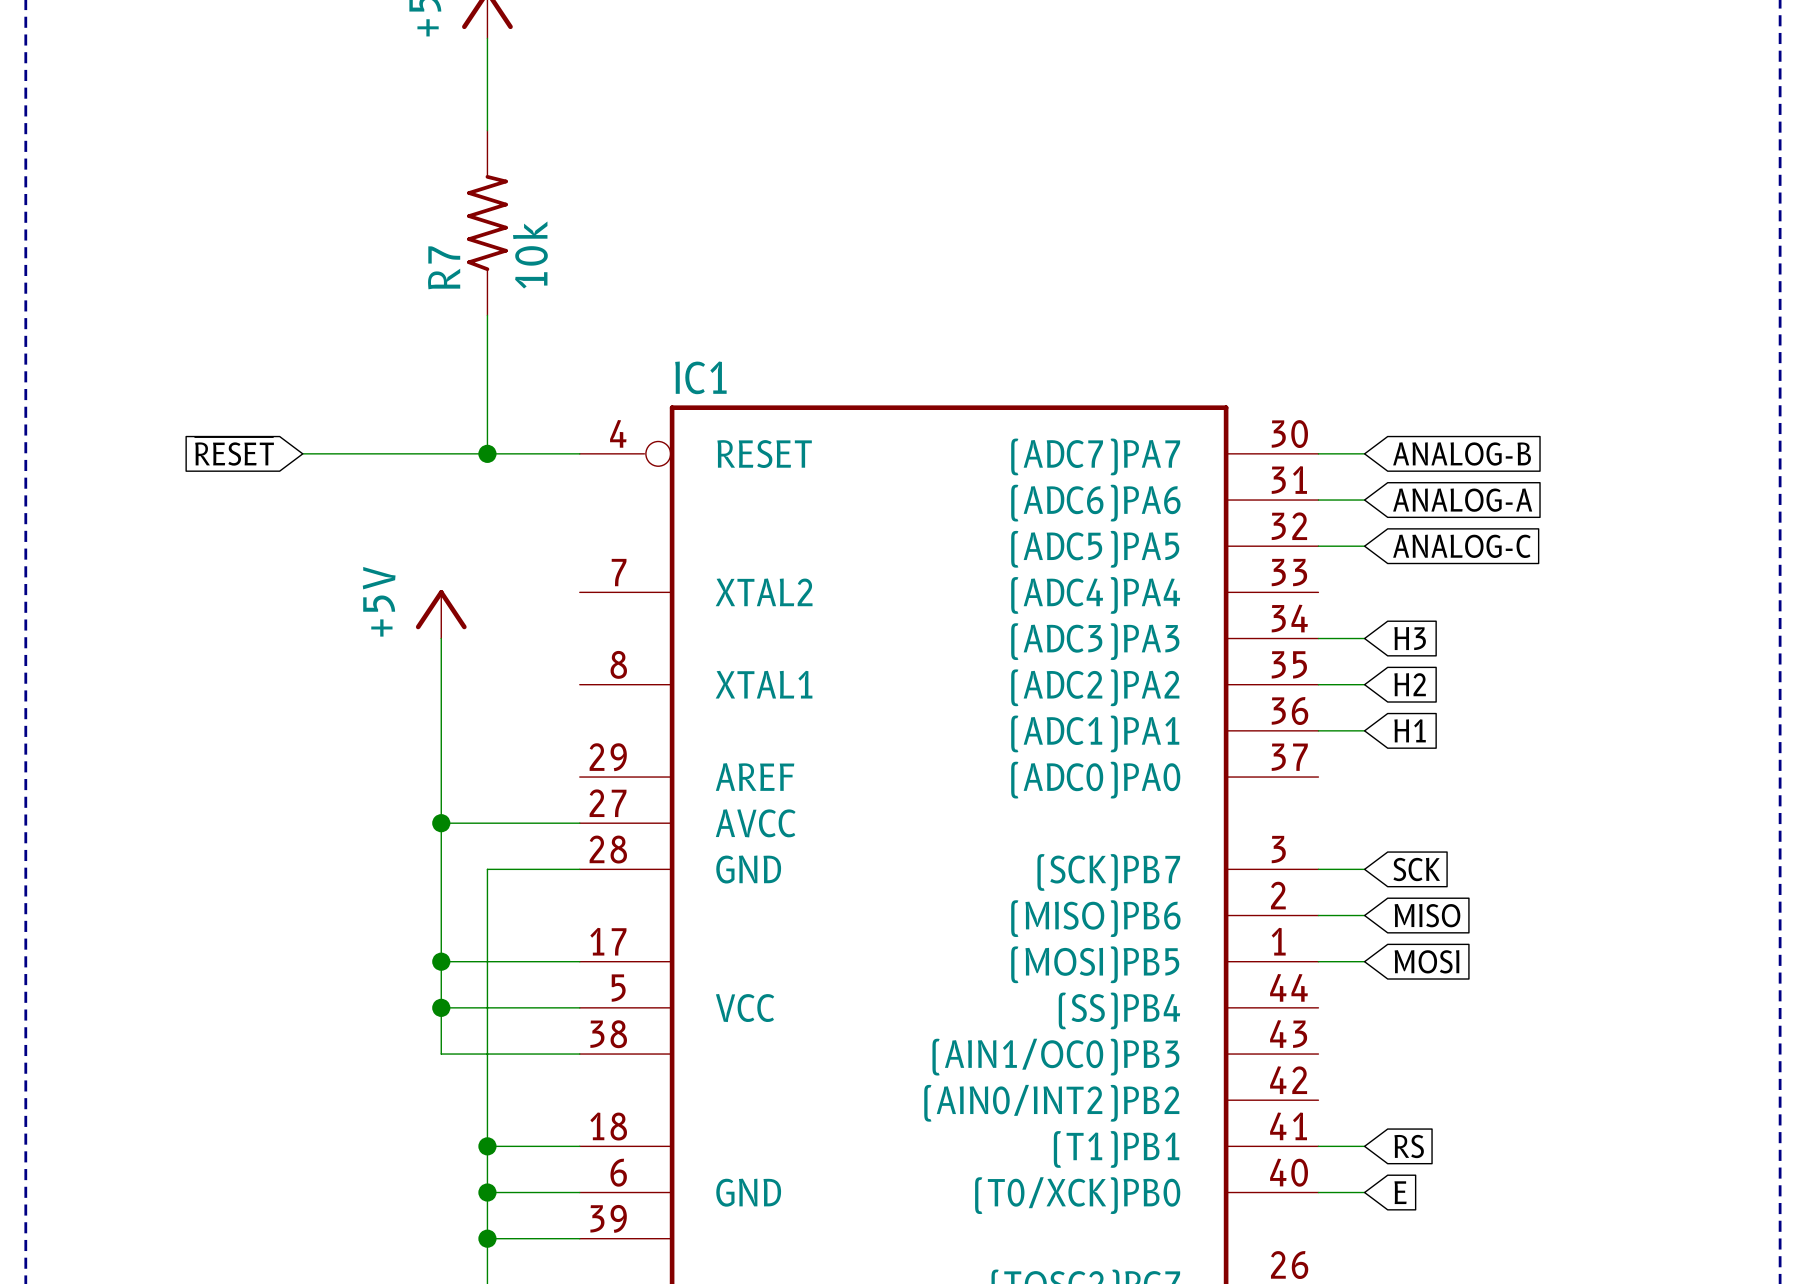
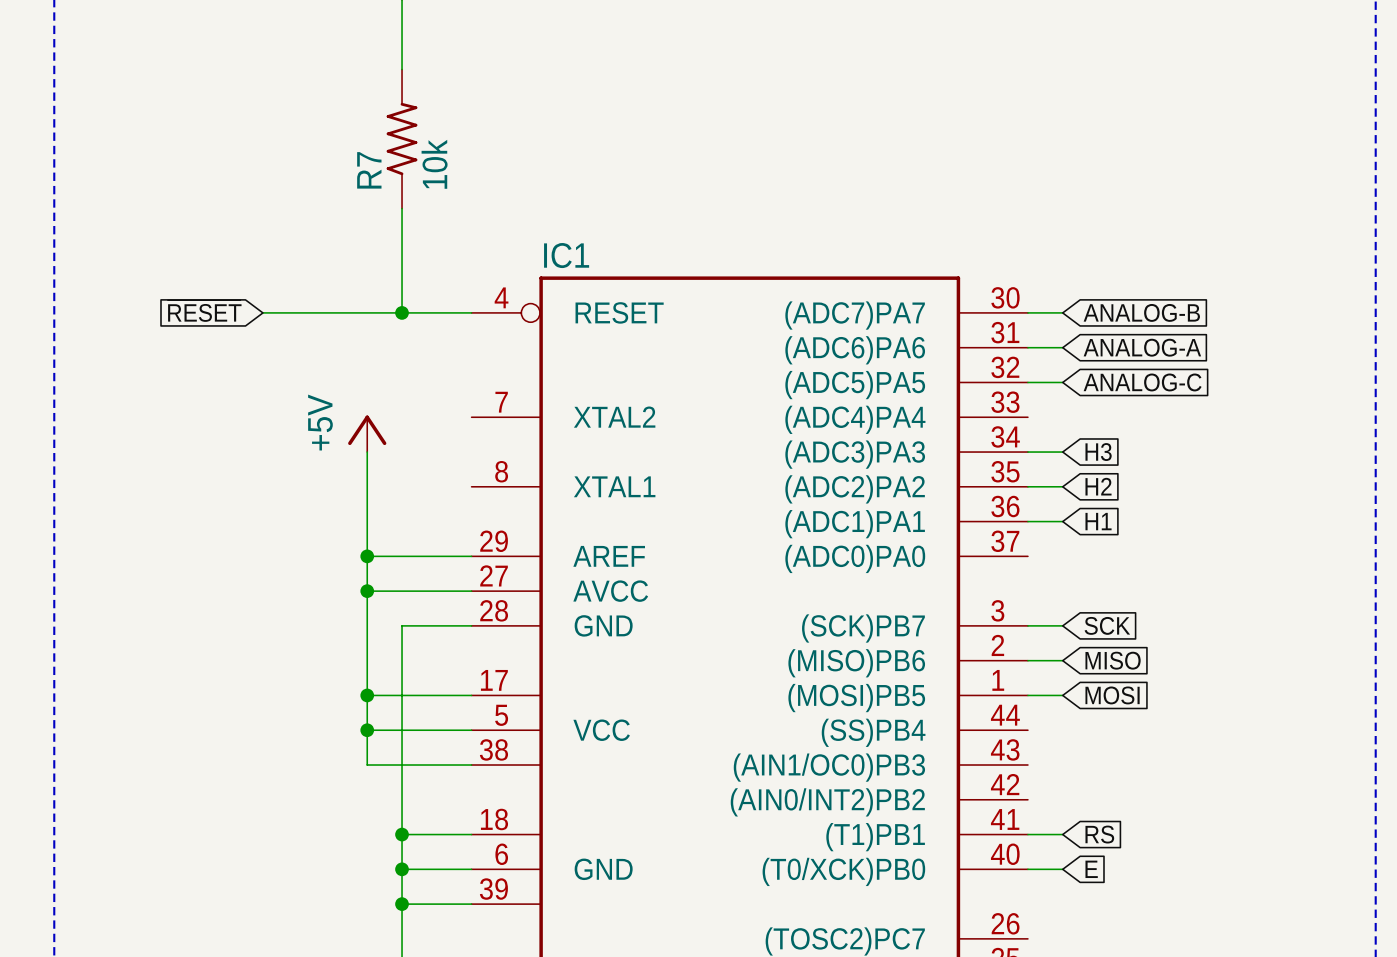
wire: none -> (367, 556) (471, 556)
junction: none -> (367, 556)

